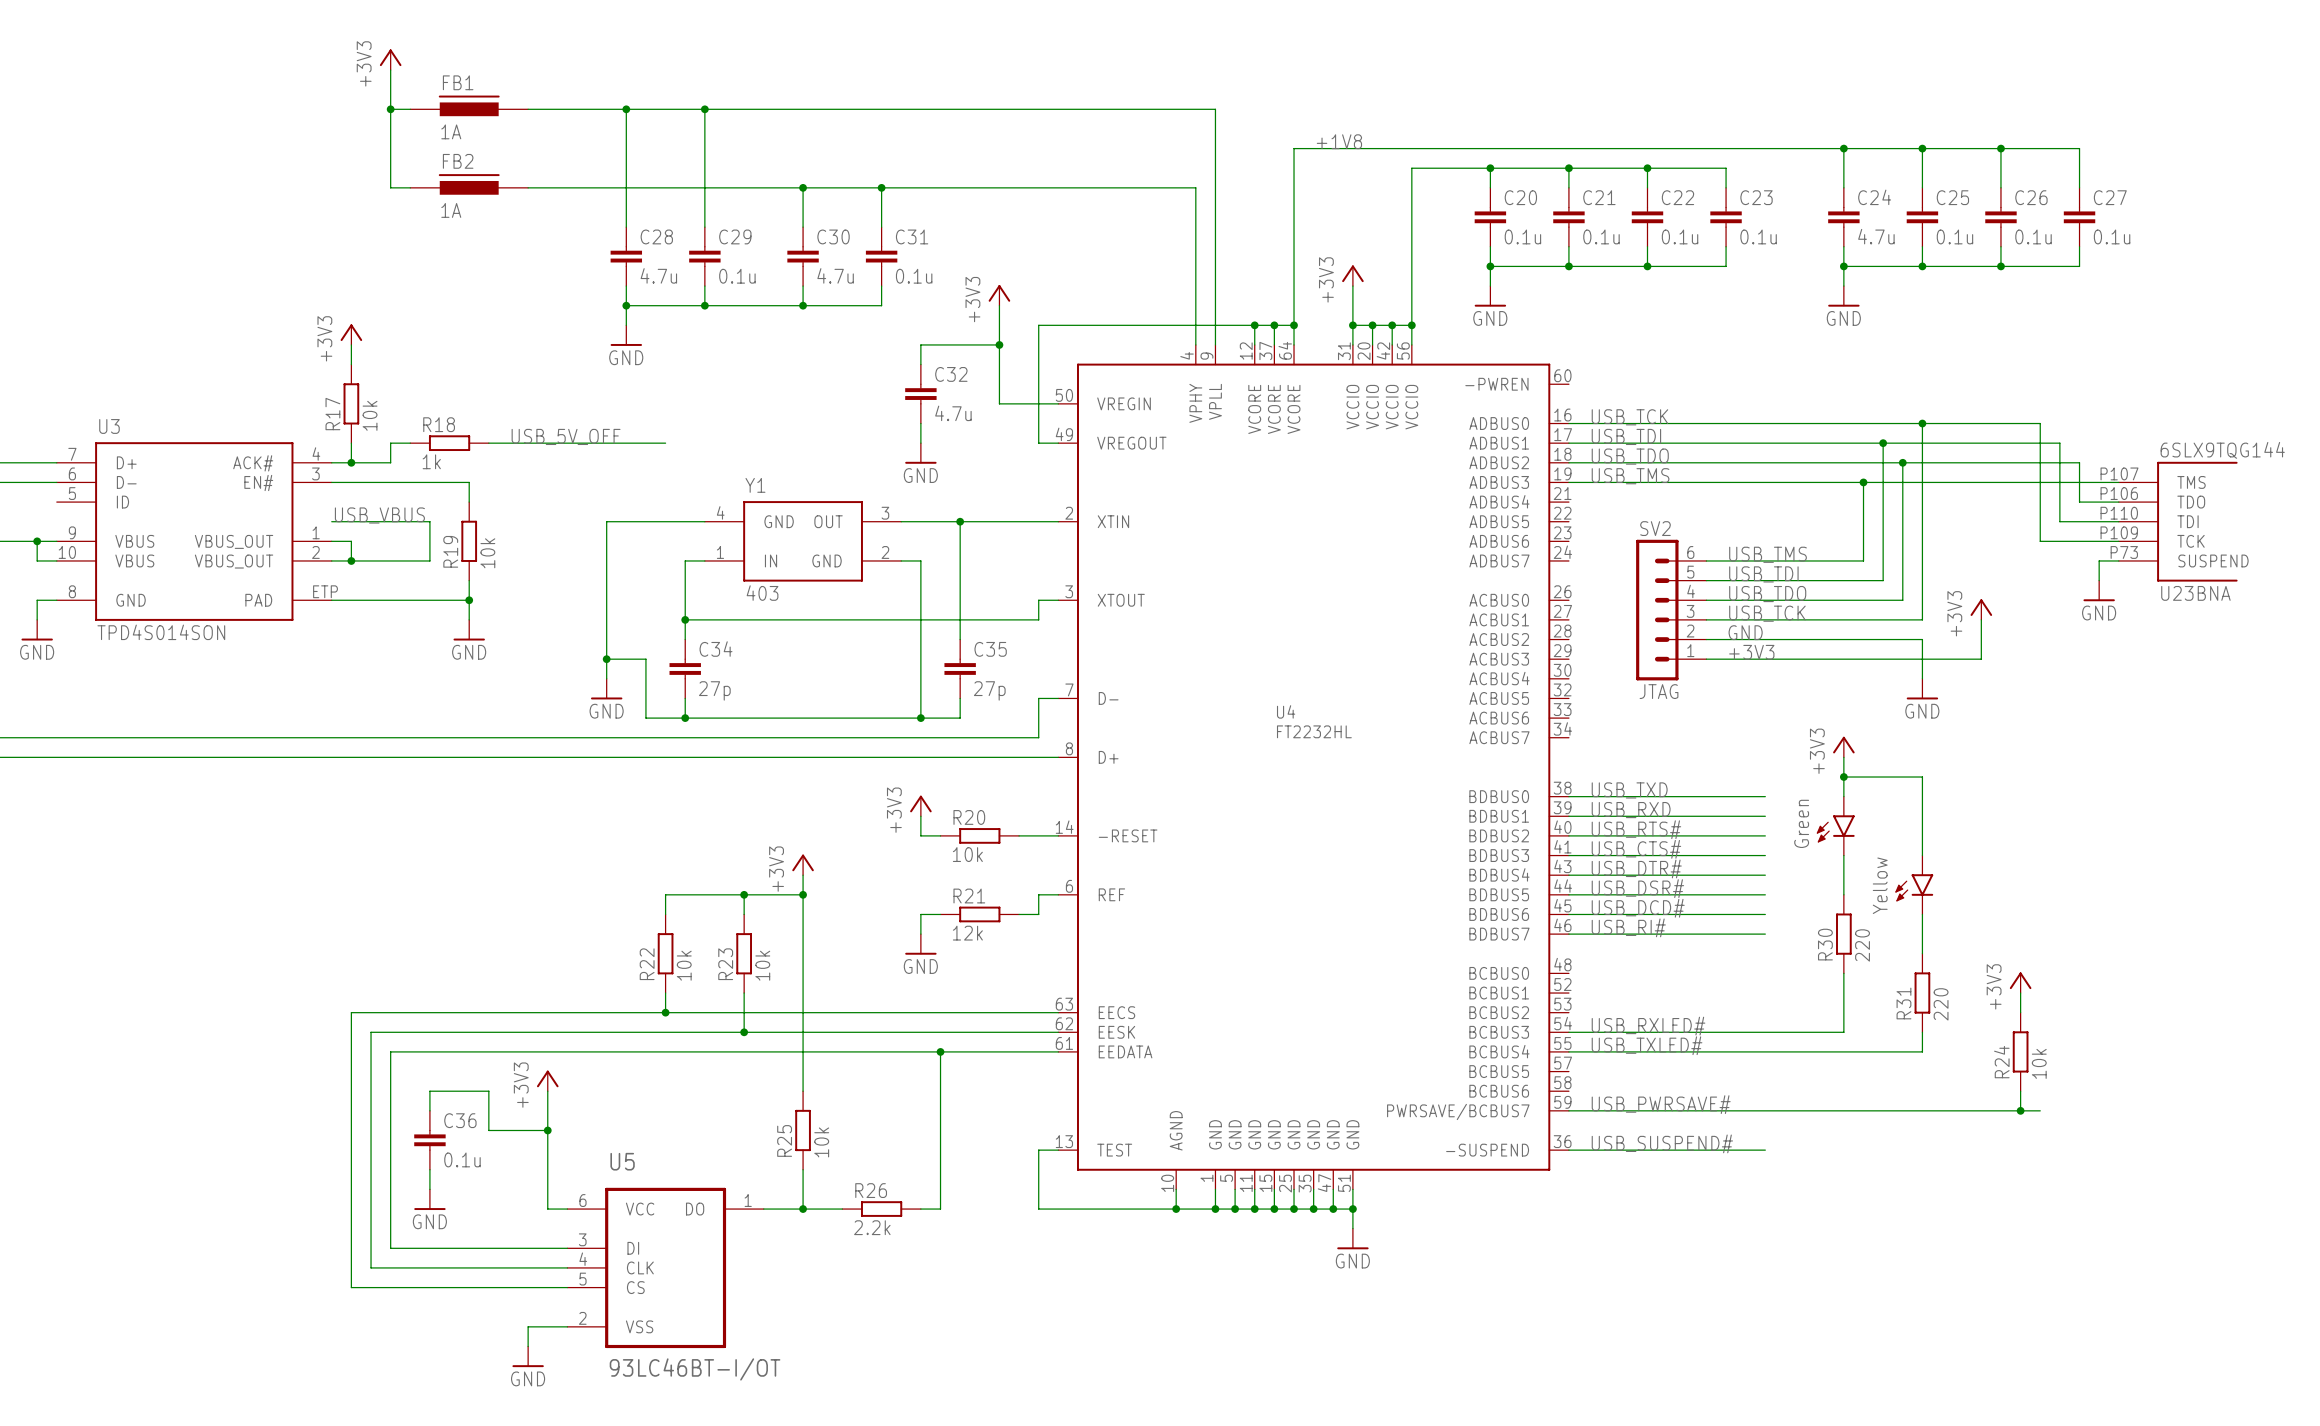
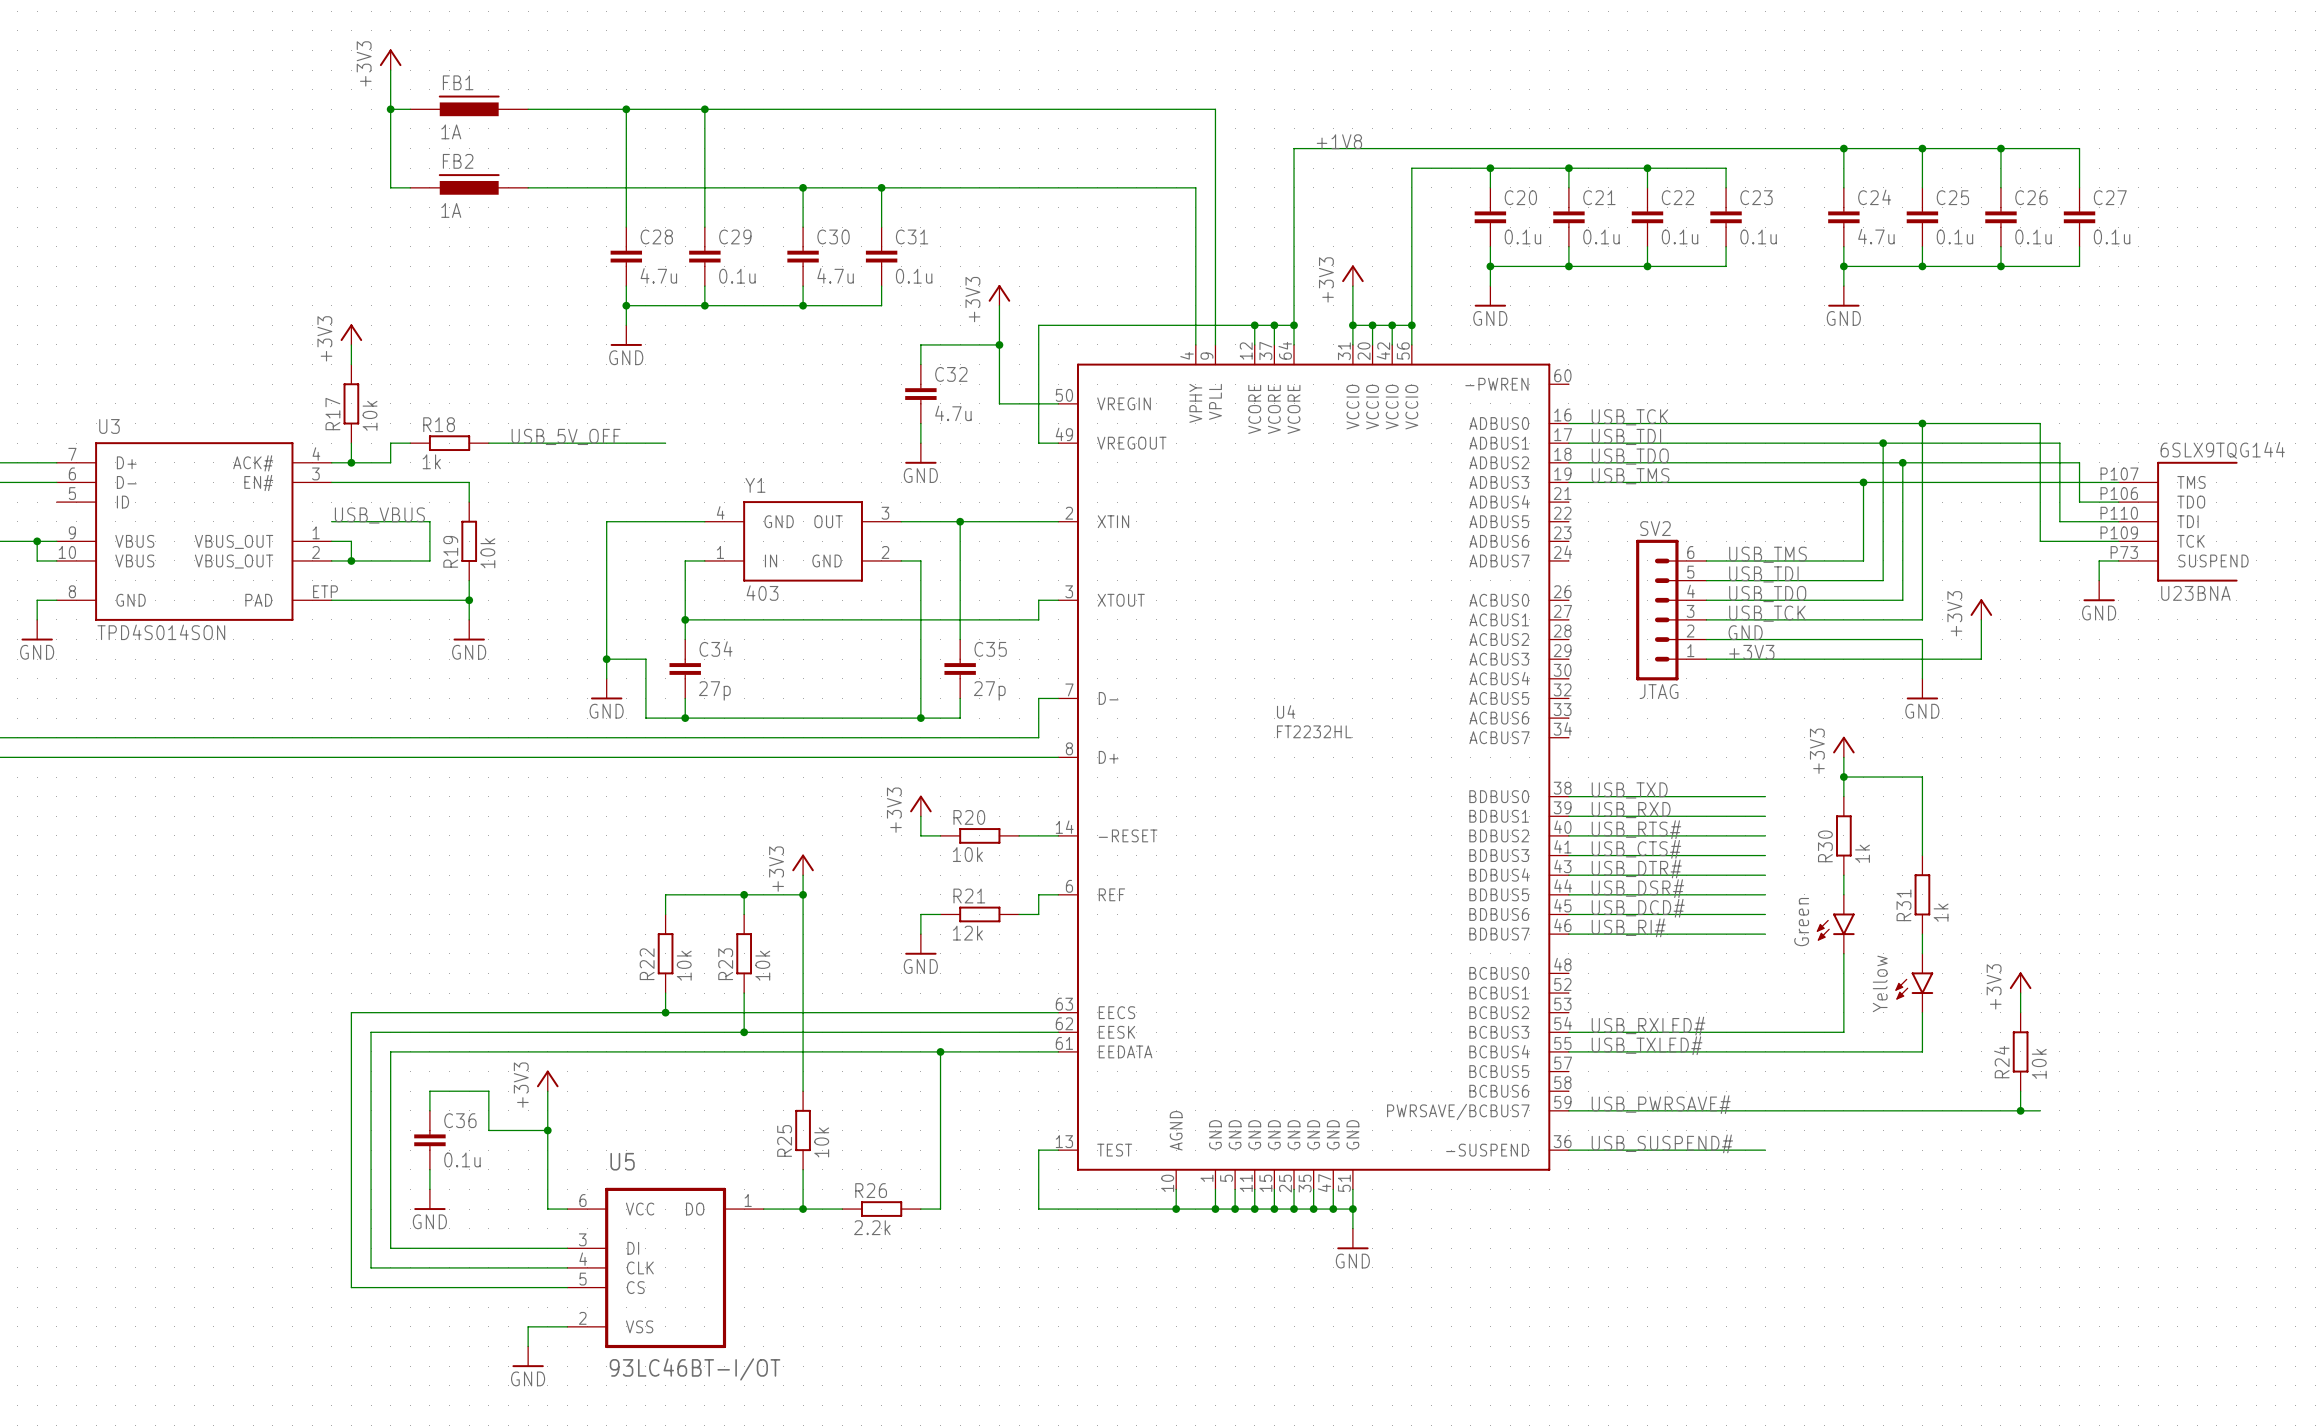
part position: (1835, 826) -> (1835, 924)
part position: (1914, 885) -> (1914, 983)
R30 position: (1843, 934) -> (1843, 835)
R30 value: 220 (1862, 945) -> 1k (1862, 853)
R31 position: (1922, 993) -> (1922, 894)
R31 value: 220 (1941, 1004) -> 1k (1941, 912)

